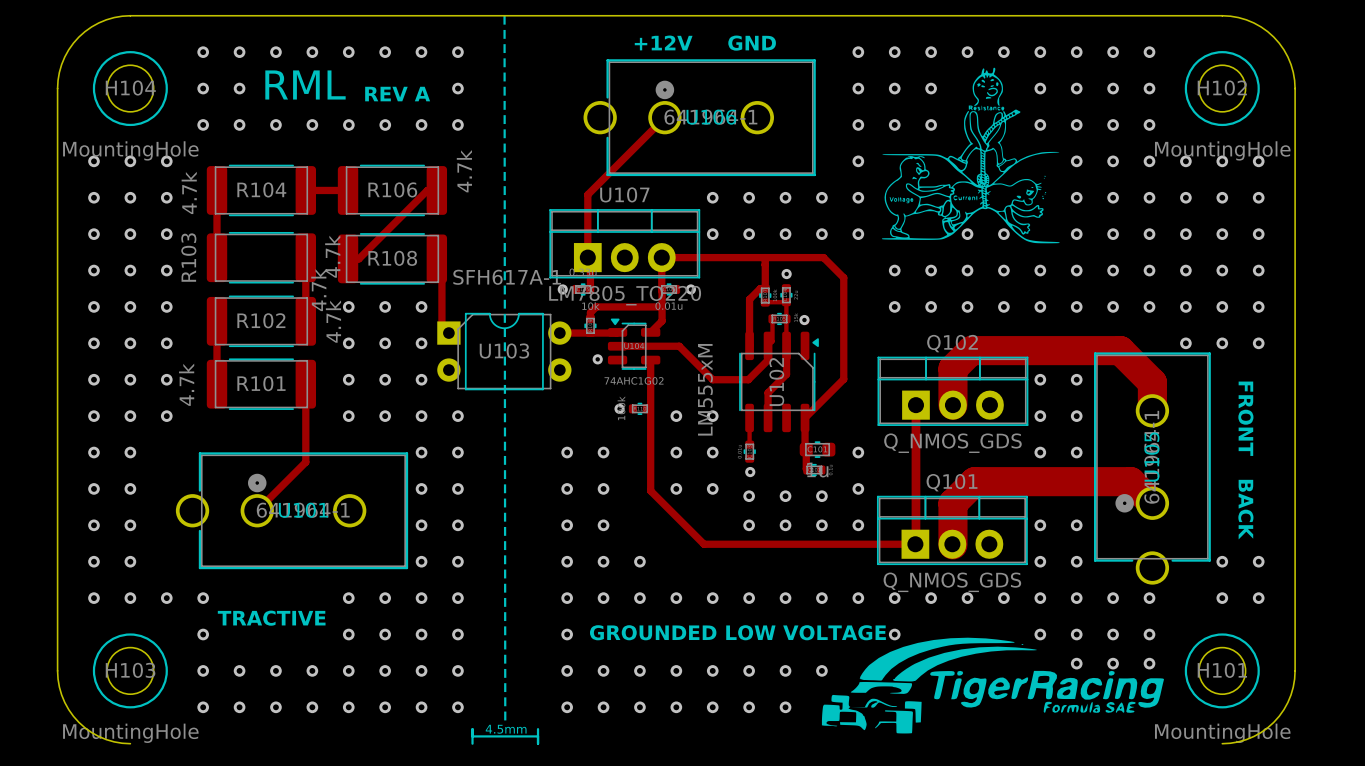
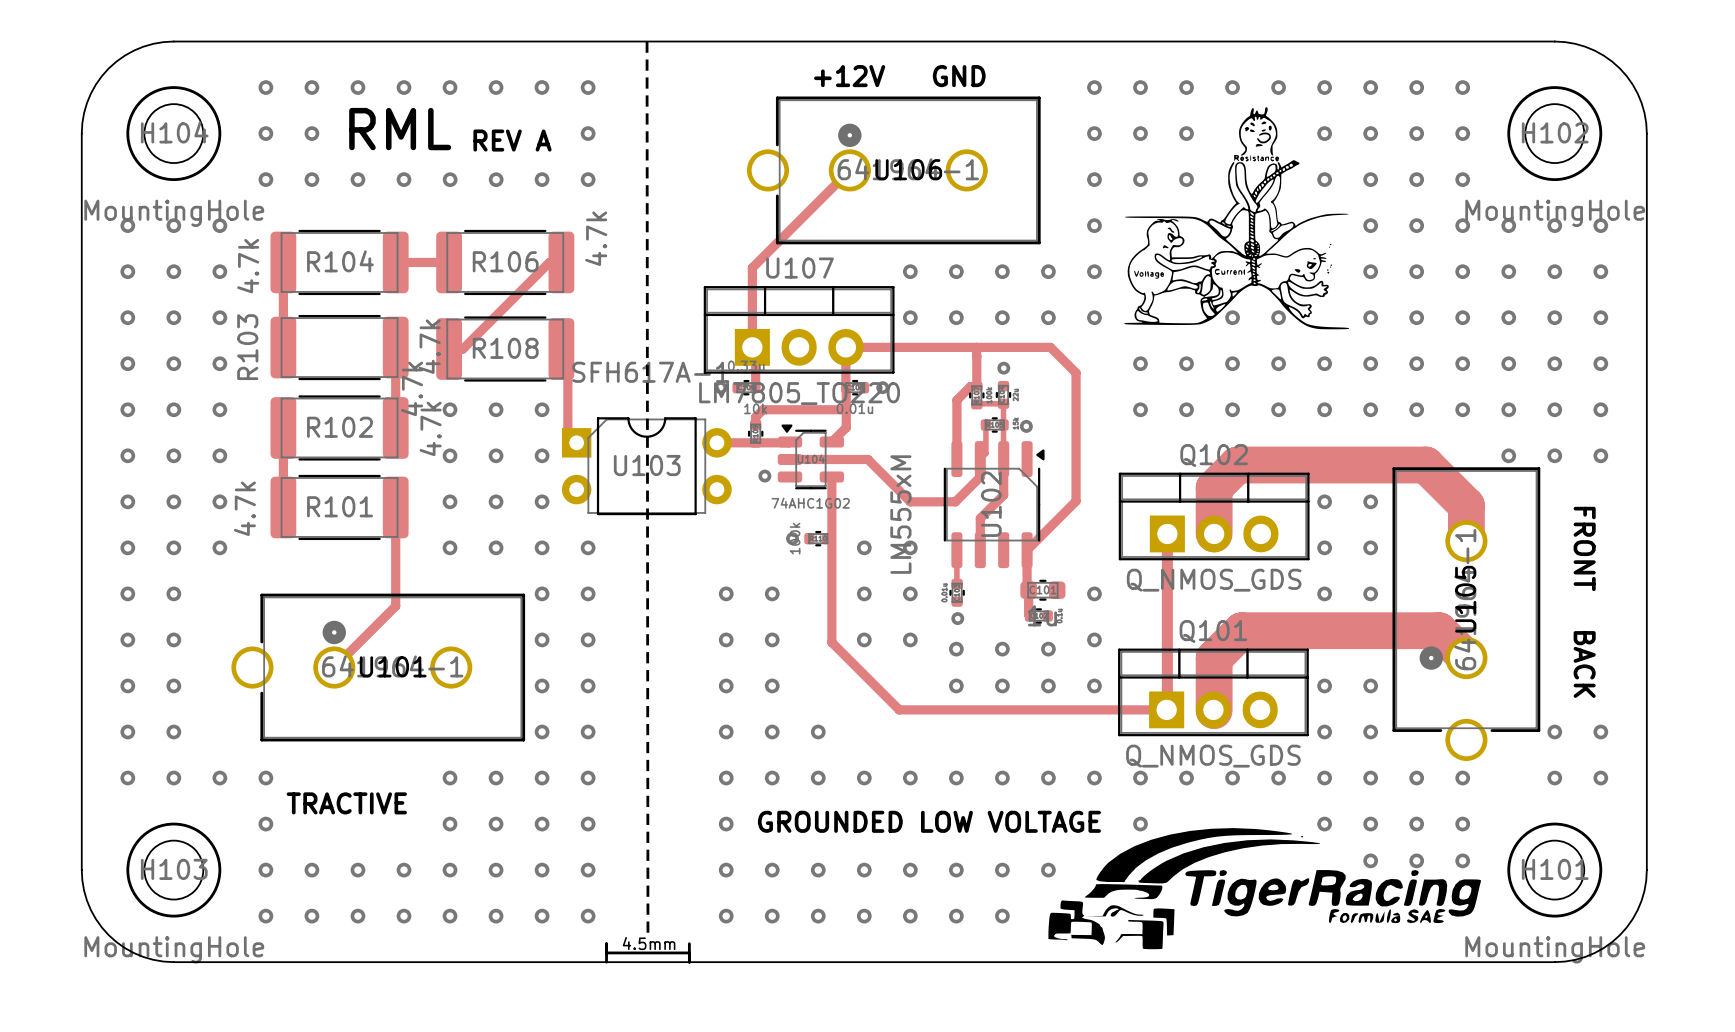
board edge: none -> (173, 962) (1554, 962)

